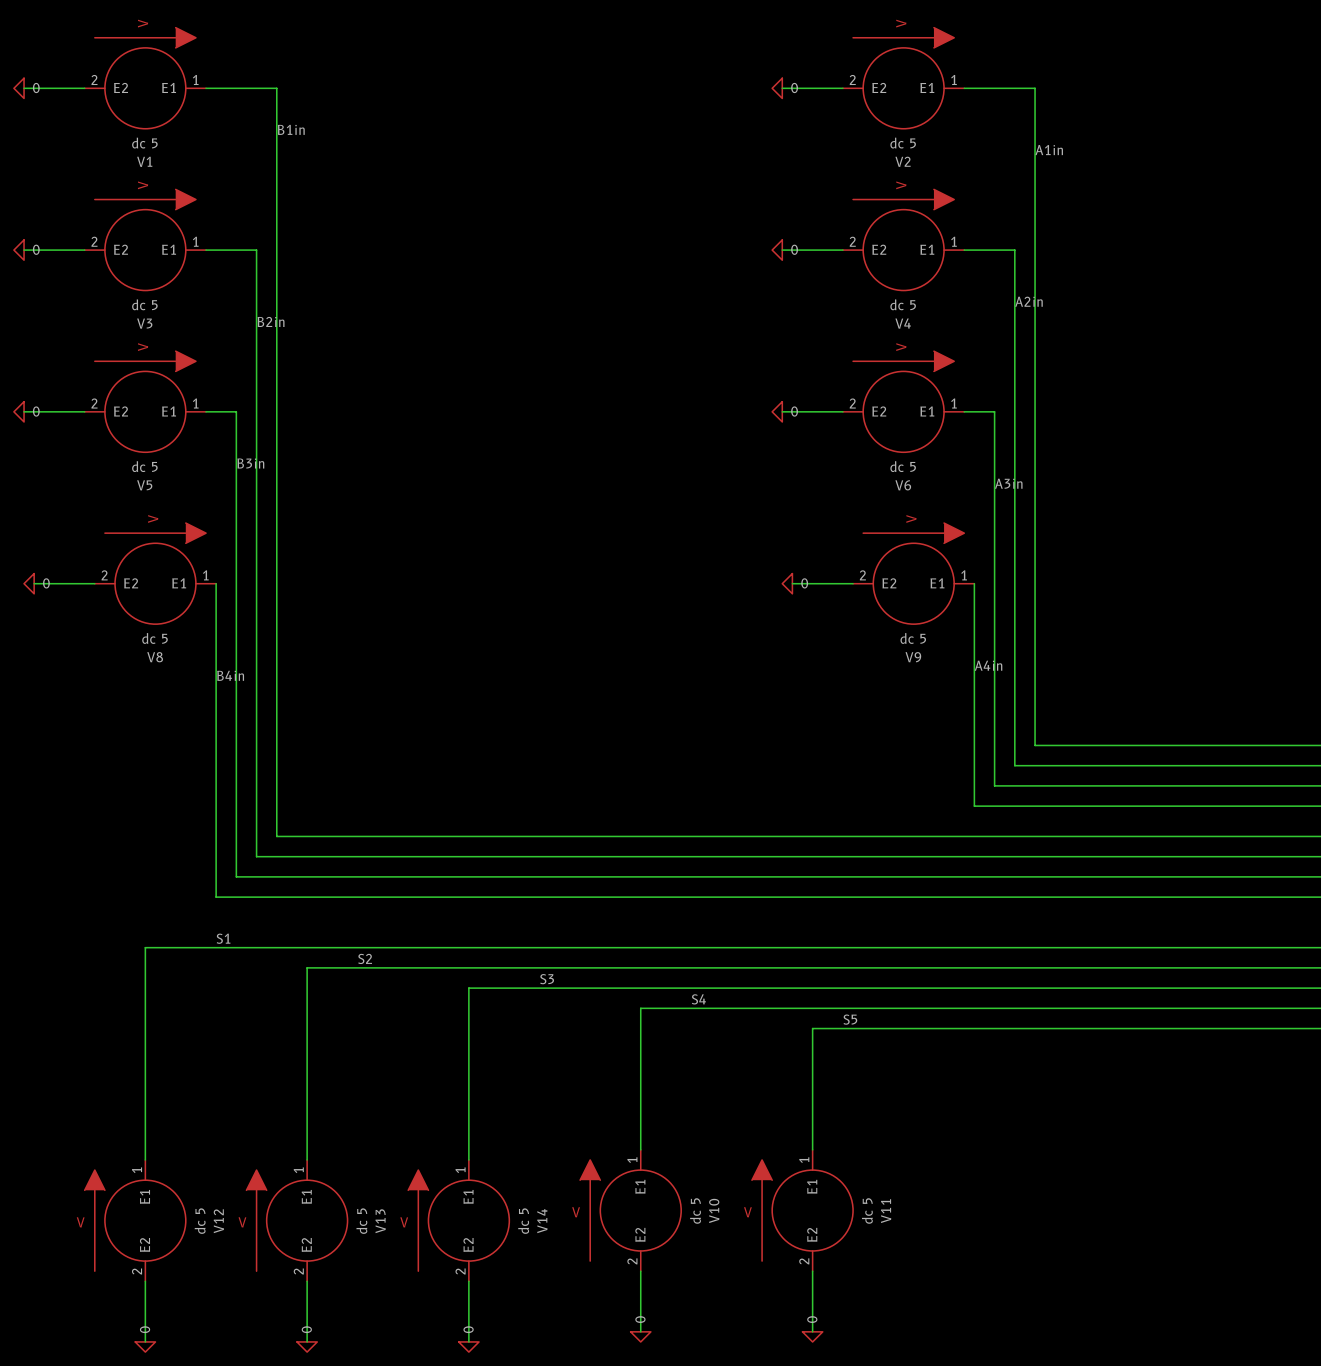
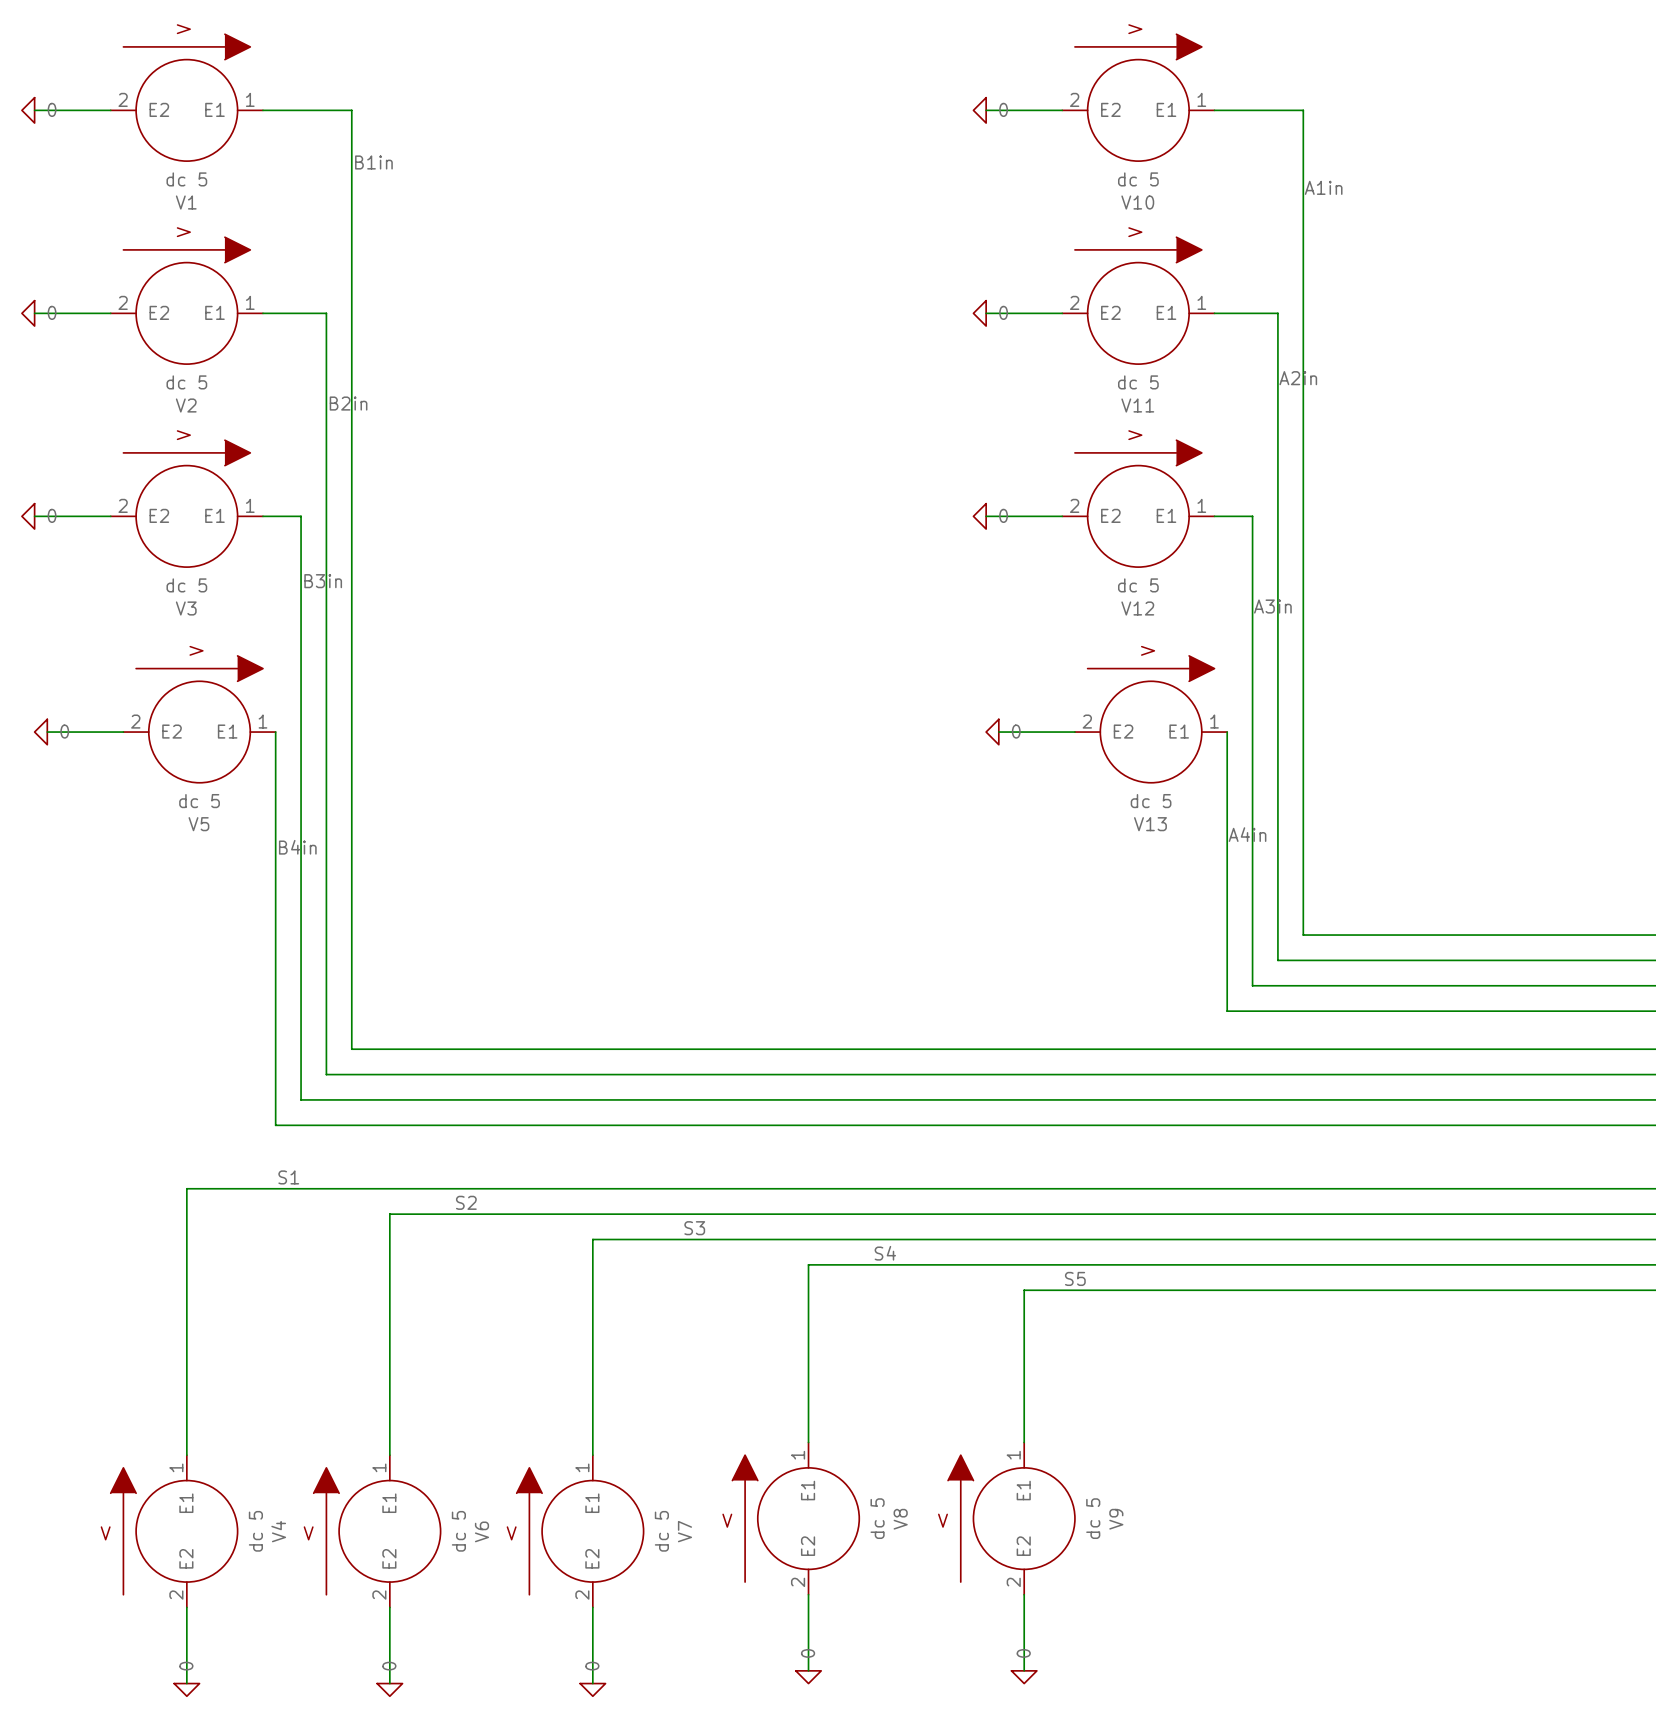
V2 name: V2 (903, 161) -> V10 (1137, 202)
V3 name: V3 (144, 323) -> V2 (186, 405)
V4 name: V4 (903, 323) -> V11 (1137, 405)
V5 name: V5 (144, 485) -> V3 (186, 608)
V6 name: V6 (903, 485) -> V12 (1137, 608)
V8 name: V8 (155, 657) -> V5 (198, 824)
V9 name: V9 (913, 657) -> V13 (1150, 824)
V10 name: V10 (714, 1210) -> V8 (900, 1519)
V11 name: V11 (886, 1211) -> V9 (1116, 1519)
V12 name: V12 (218, 1221) -> V4 (278, 1531)
V13 name: V13 (380, 1221) -> V6 (481, 1531)
V14 name: V14 (542, 1221) -> V7 (684, 1531)

